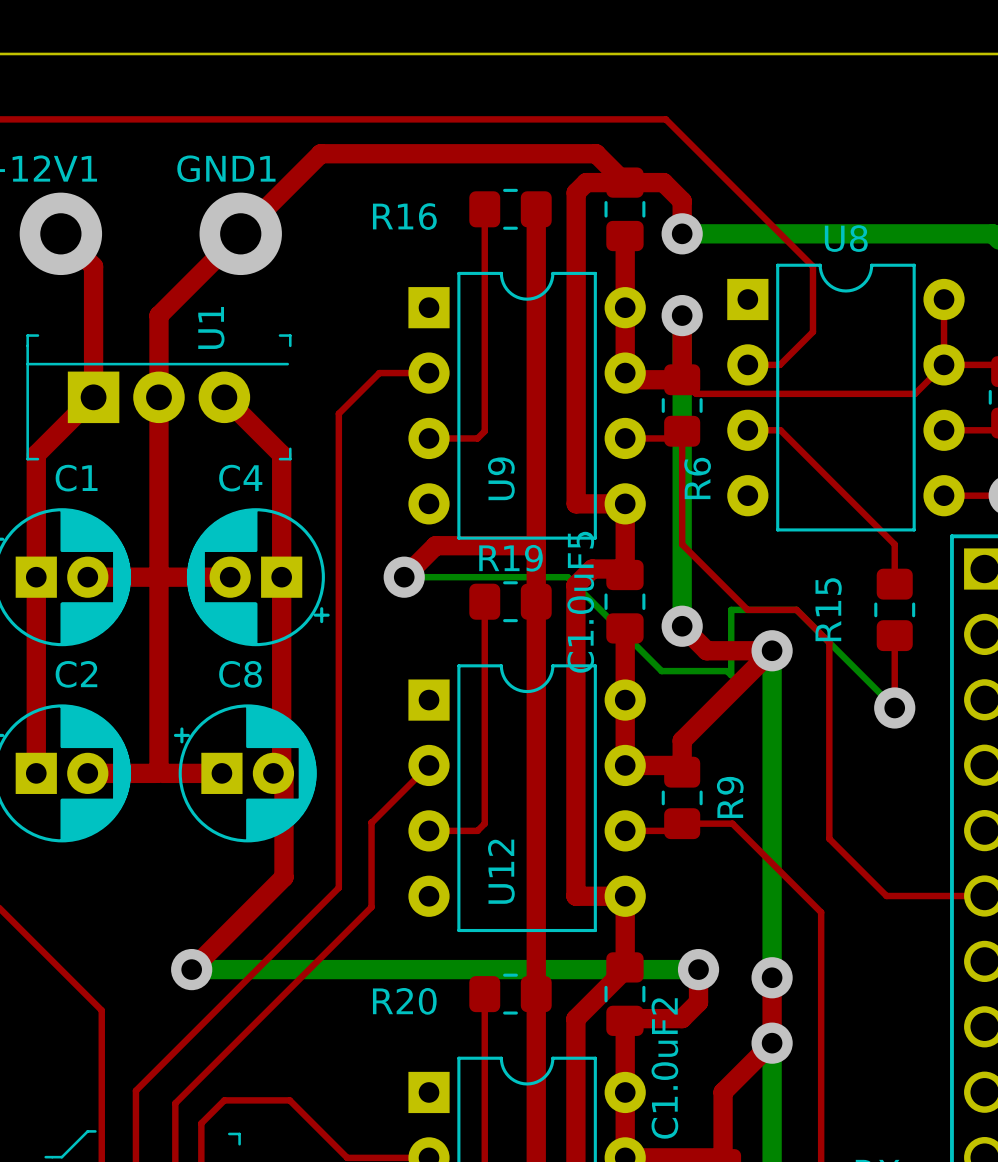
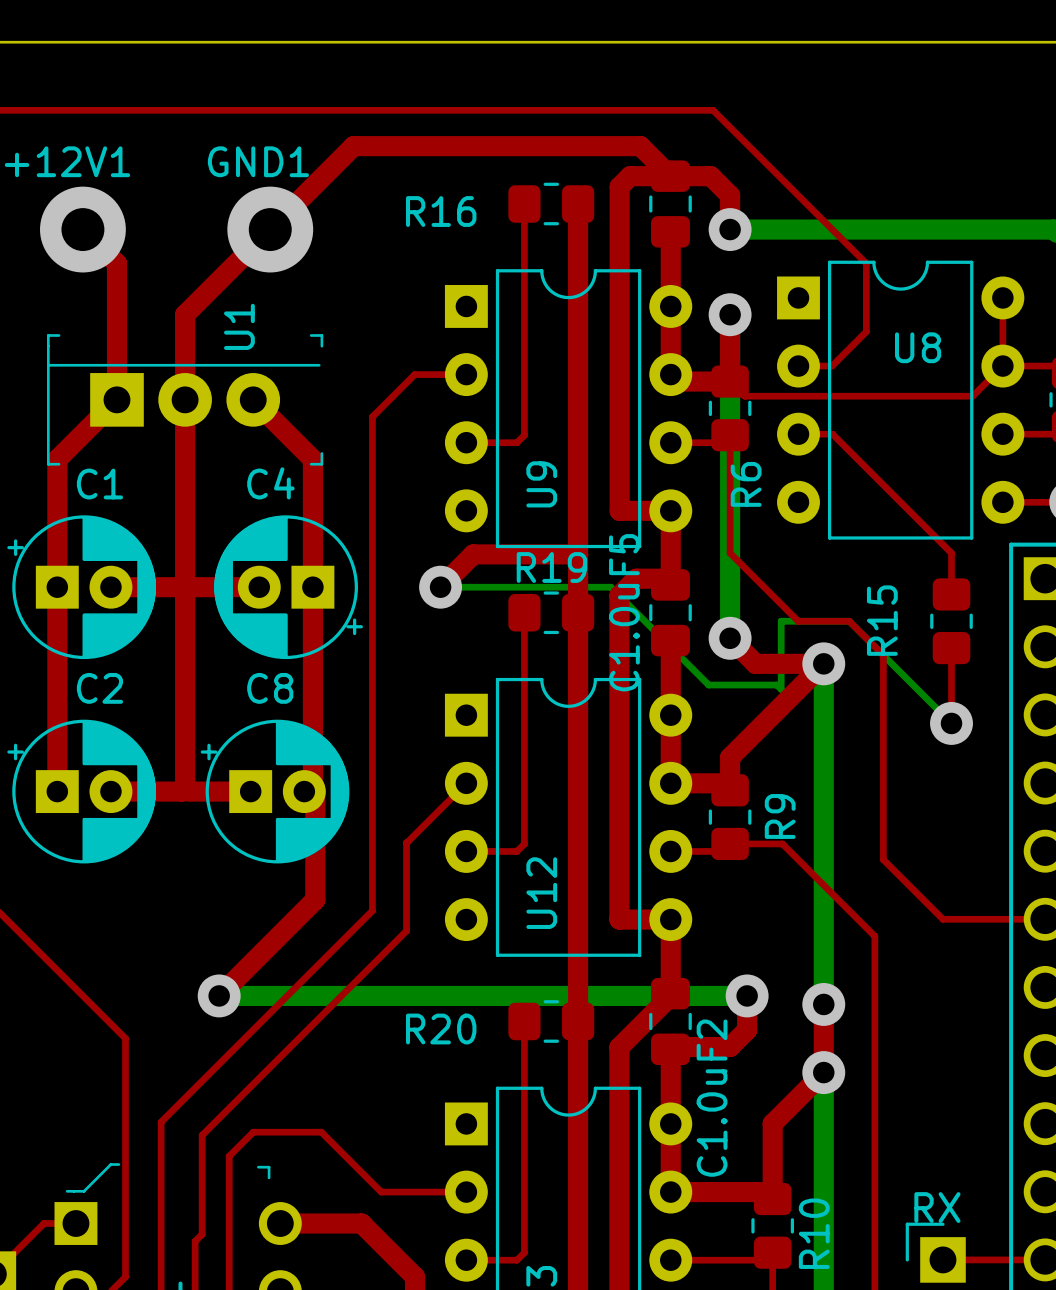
U8 name position: U8 (846, 238) -> U8 (918, 347)

